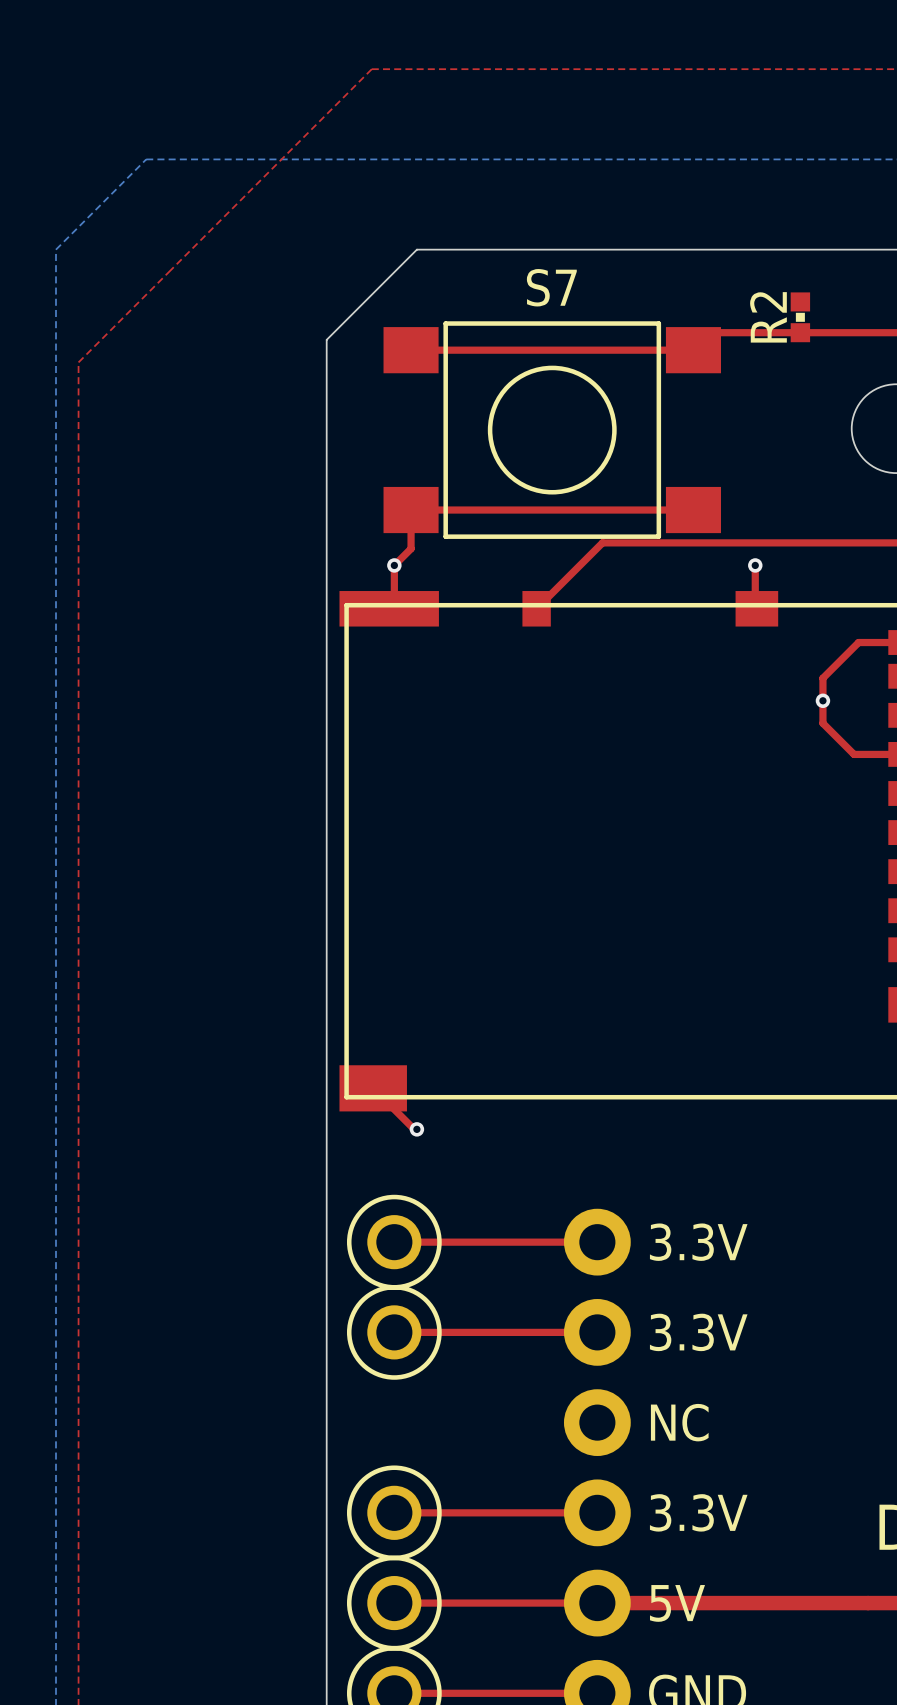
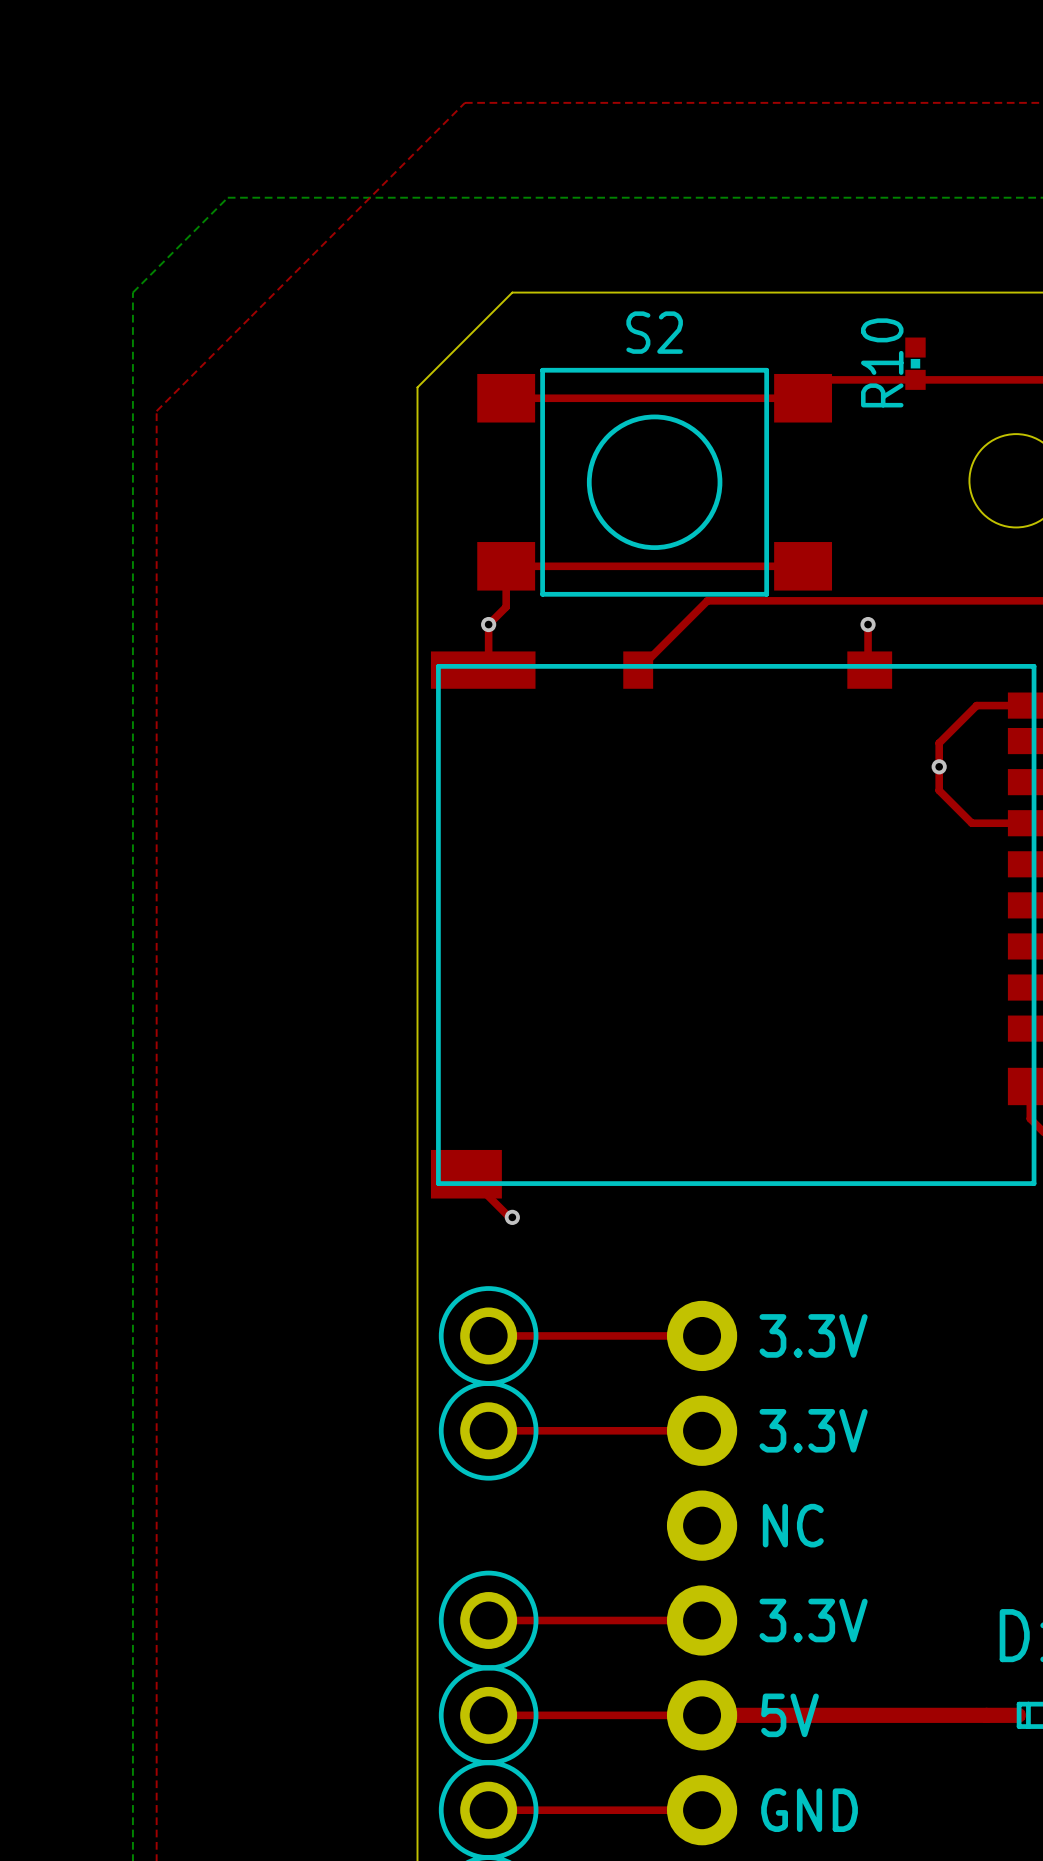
S7 name: S7 (551, 287) -> S2 (654, 332)
R2 name: R2 (768, 317) -> R10 (882, 362)

